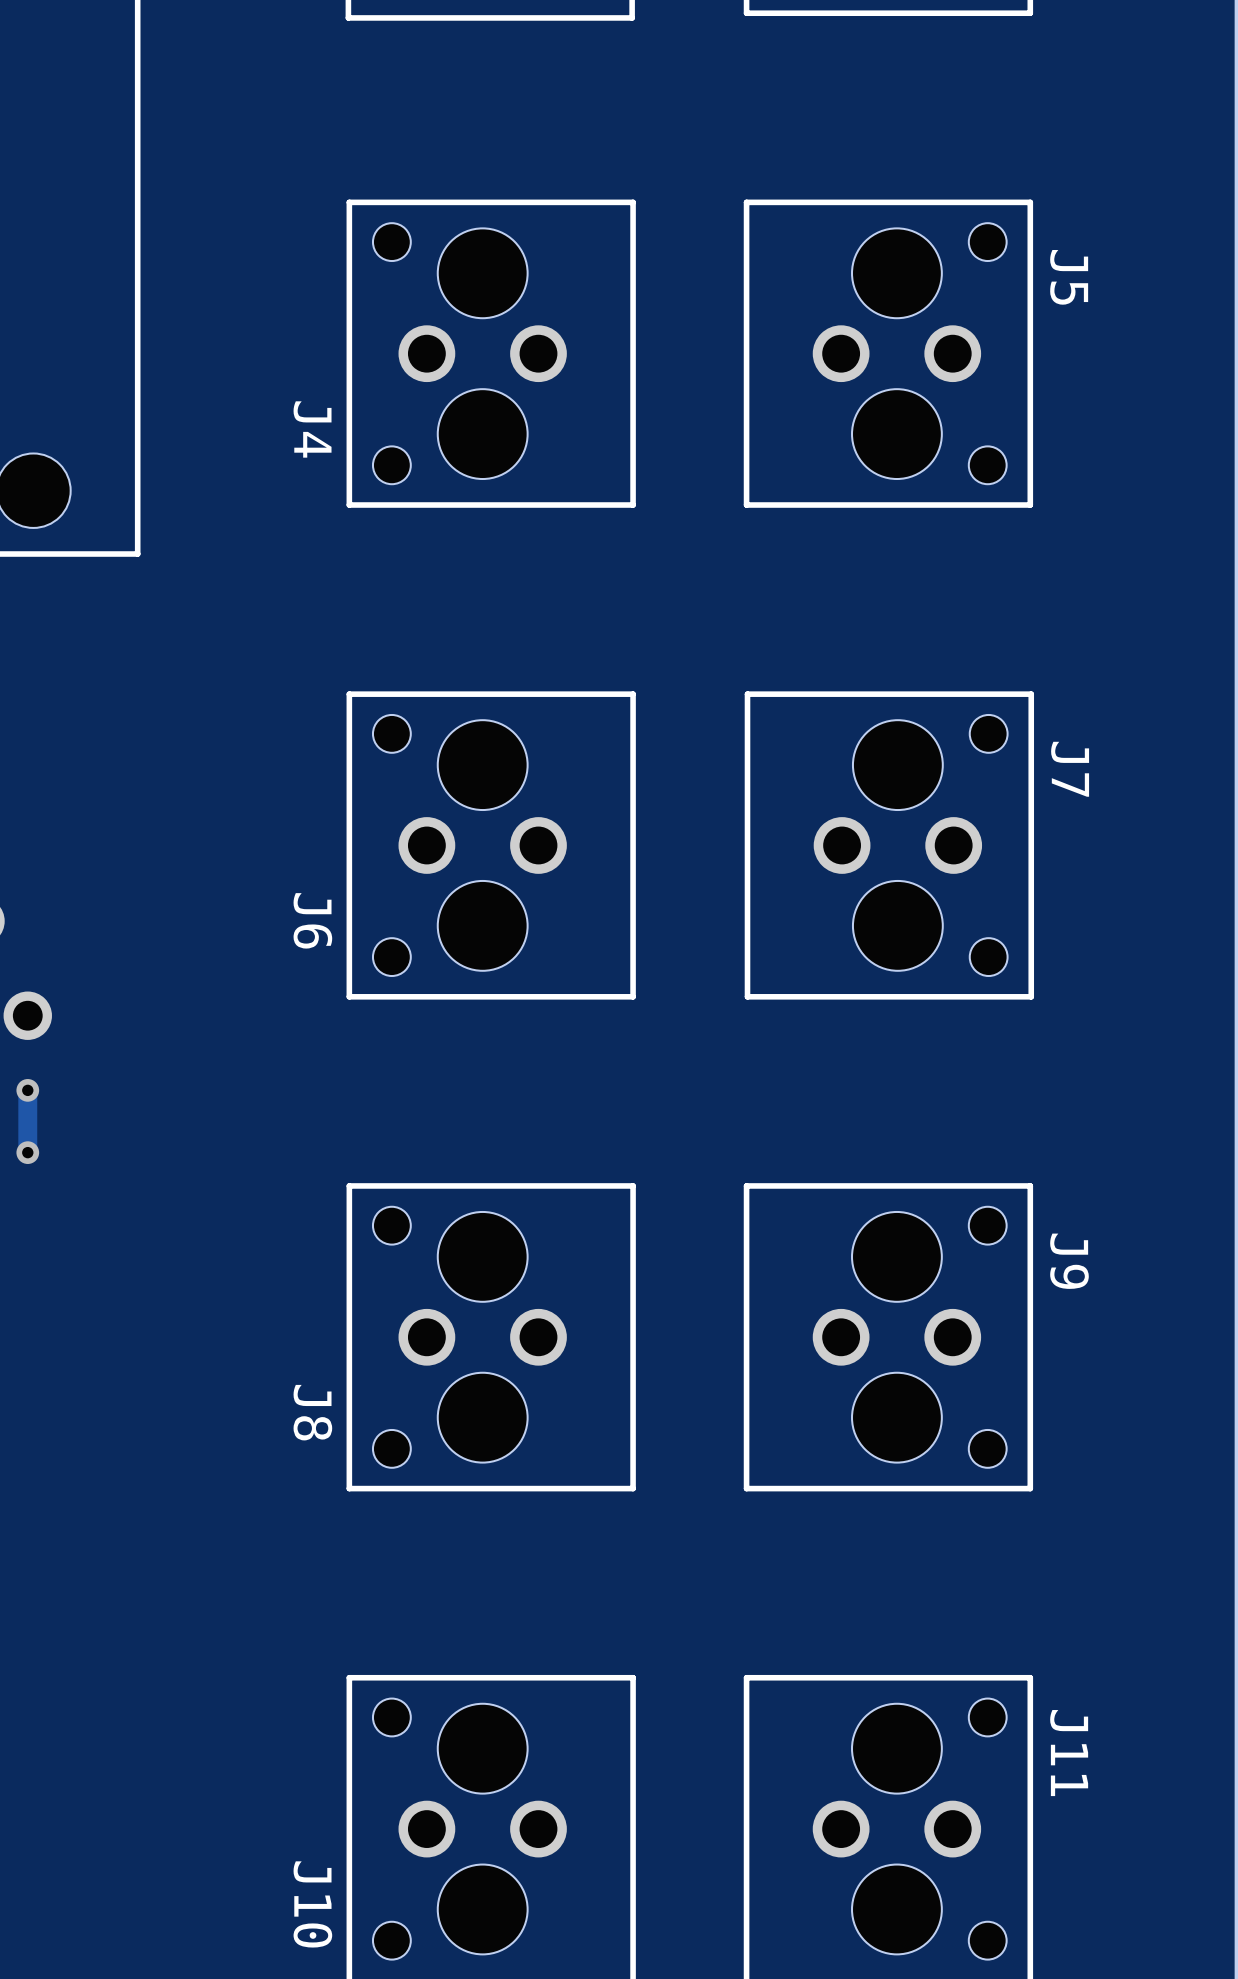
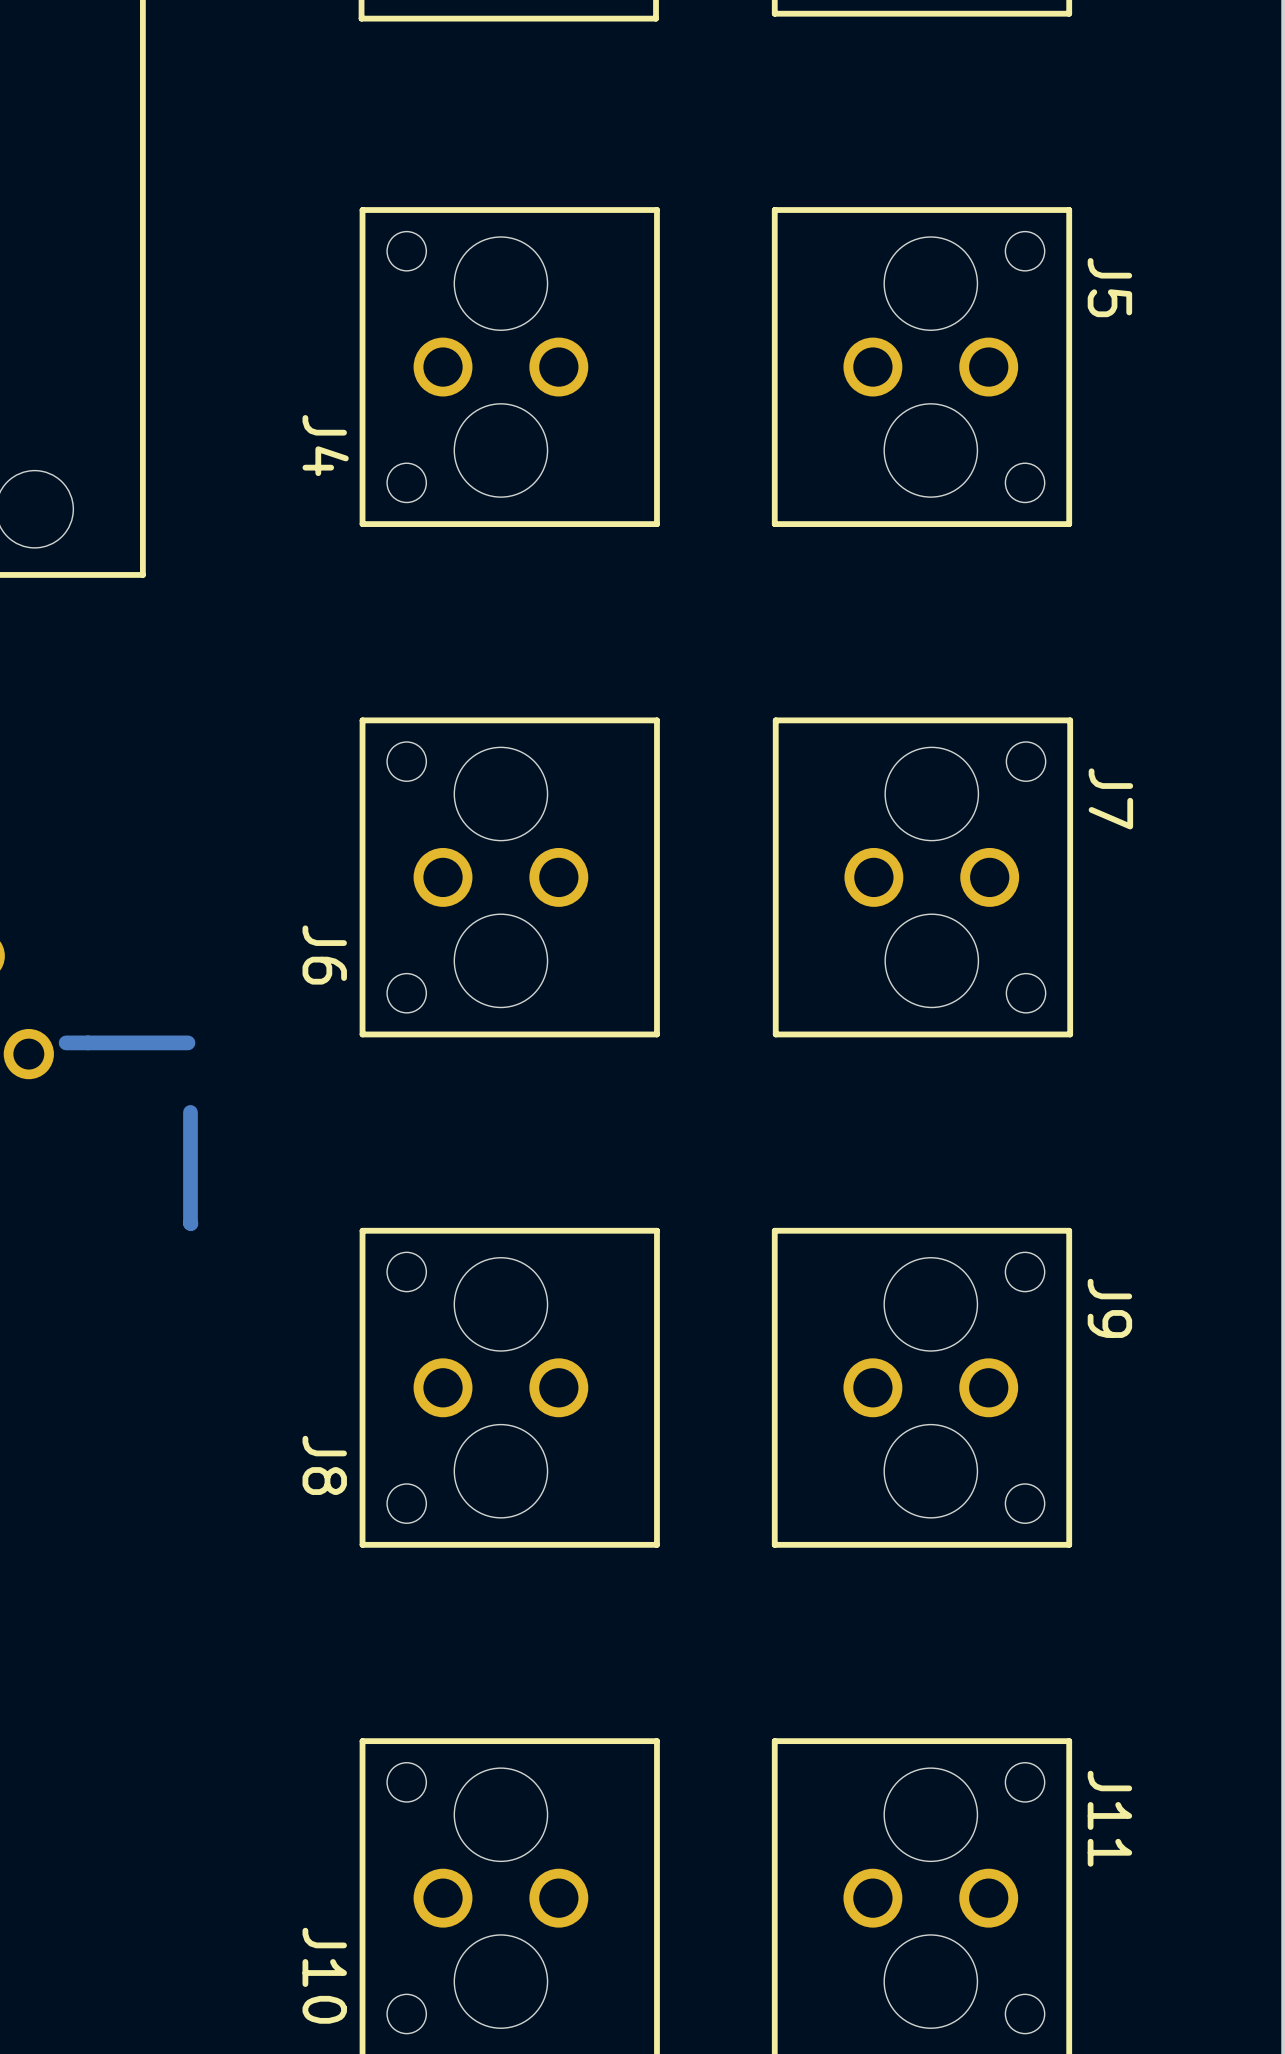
track: none -> (188, 1042) (66, 1042)
track: none -> (190, 1112) (190, 1223)
track: (27, 1090) (27, 1152) -> none
via: (27, 1090) -> none
via: (27, 1152) -> none

